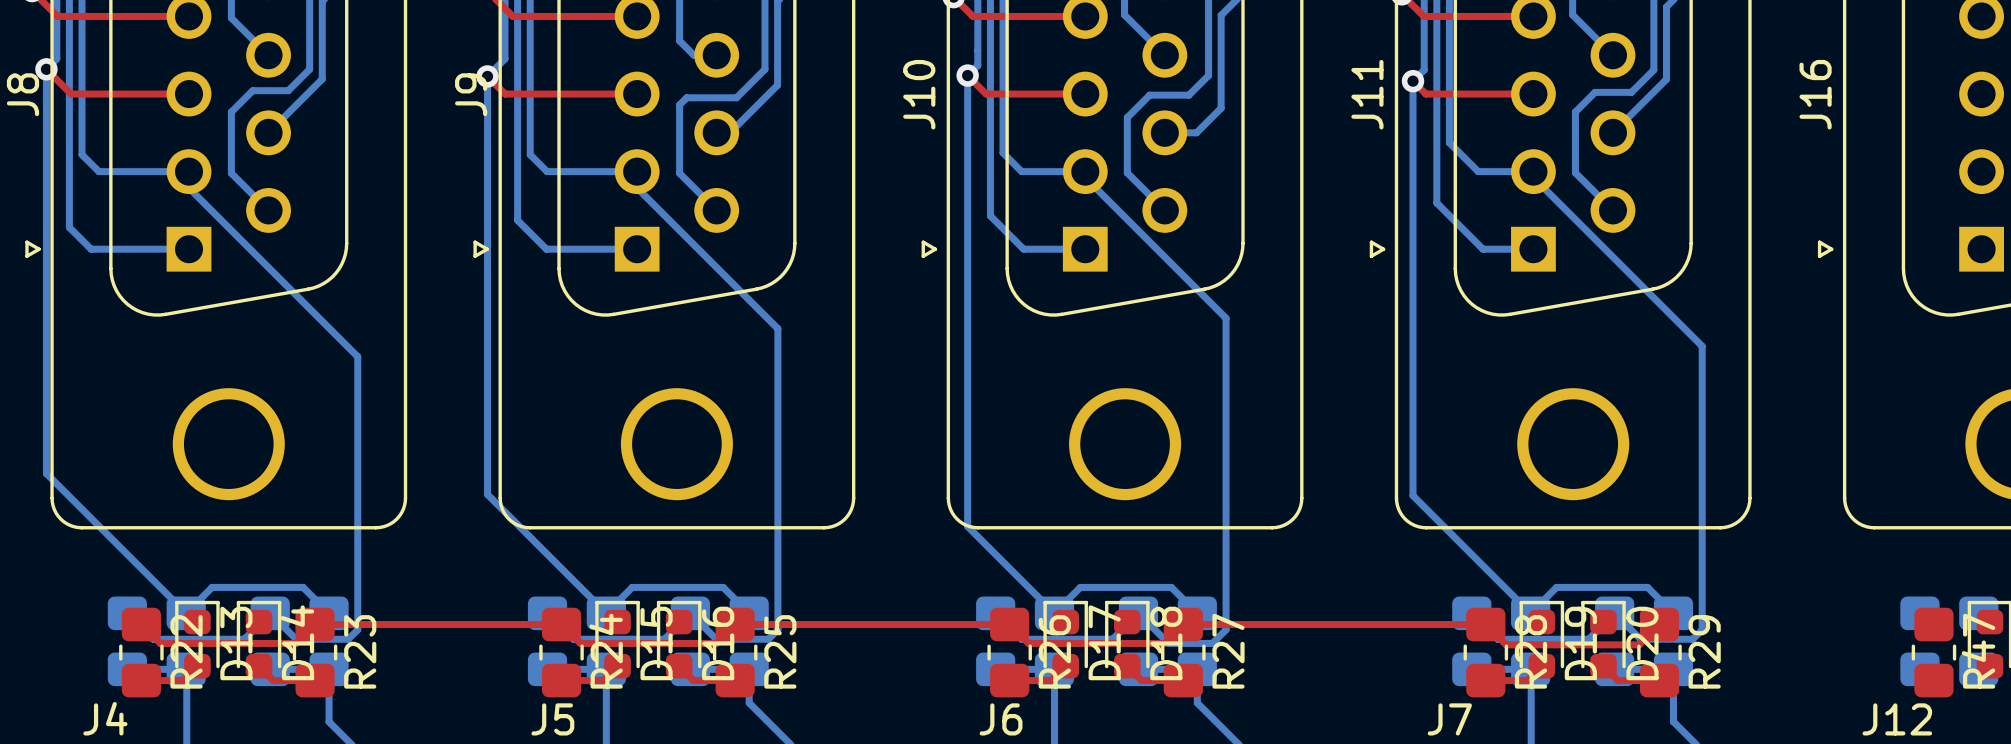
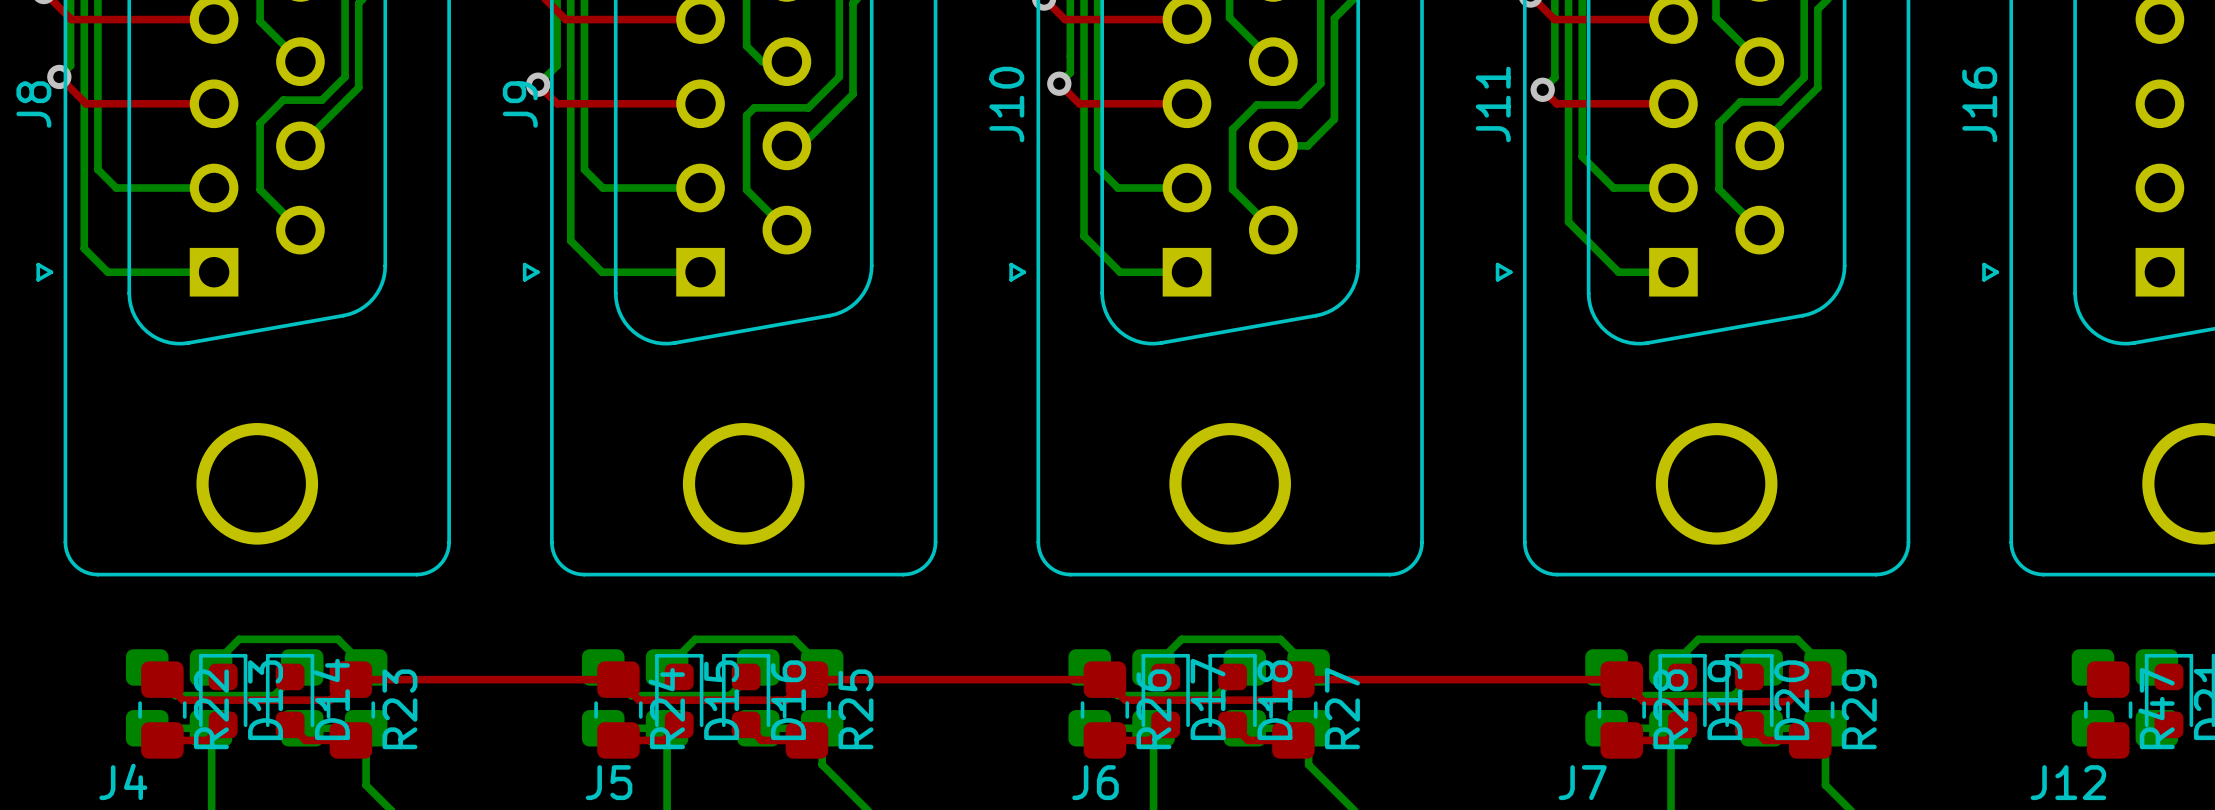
bottom track: (46, 69) (46, 473) (186, 613) -> none
bottom track: (967, 75) (967, 526) (1054, 613) -> none
bottom track: (487, 76) (487, 494) (606, 613) -> none
bottom track: (1413, 81) (1413, 495) (1530, 613) -> none
bottom track: (189, 171) (189, 188) (357, 356) (357, 629) (348, 639) (296, 639) (270, 613) -> none
bottom track: (637, 171) (637, 188) (777, 328) (777, 629) (768, 639) (716, 639) (690, 613) -> none
bottom track: (1085, 171) (1085, 177) (1226, 318) (1226, 629) (1212, 643) (1168, 643) (1138, 613) -> none
bottom track: (1533, 171) (1533, 177) (1702, 346) (1702, 629) (1692, 639) (1640, 639) (1614, 613) -> none

